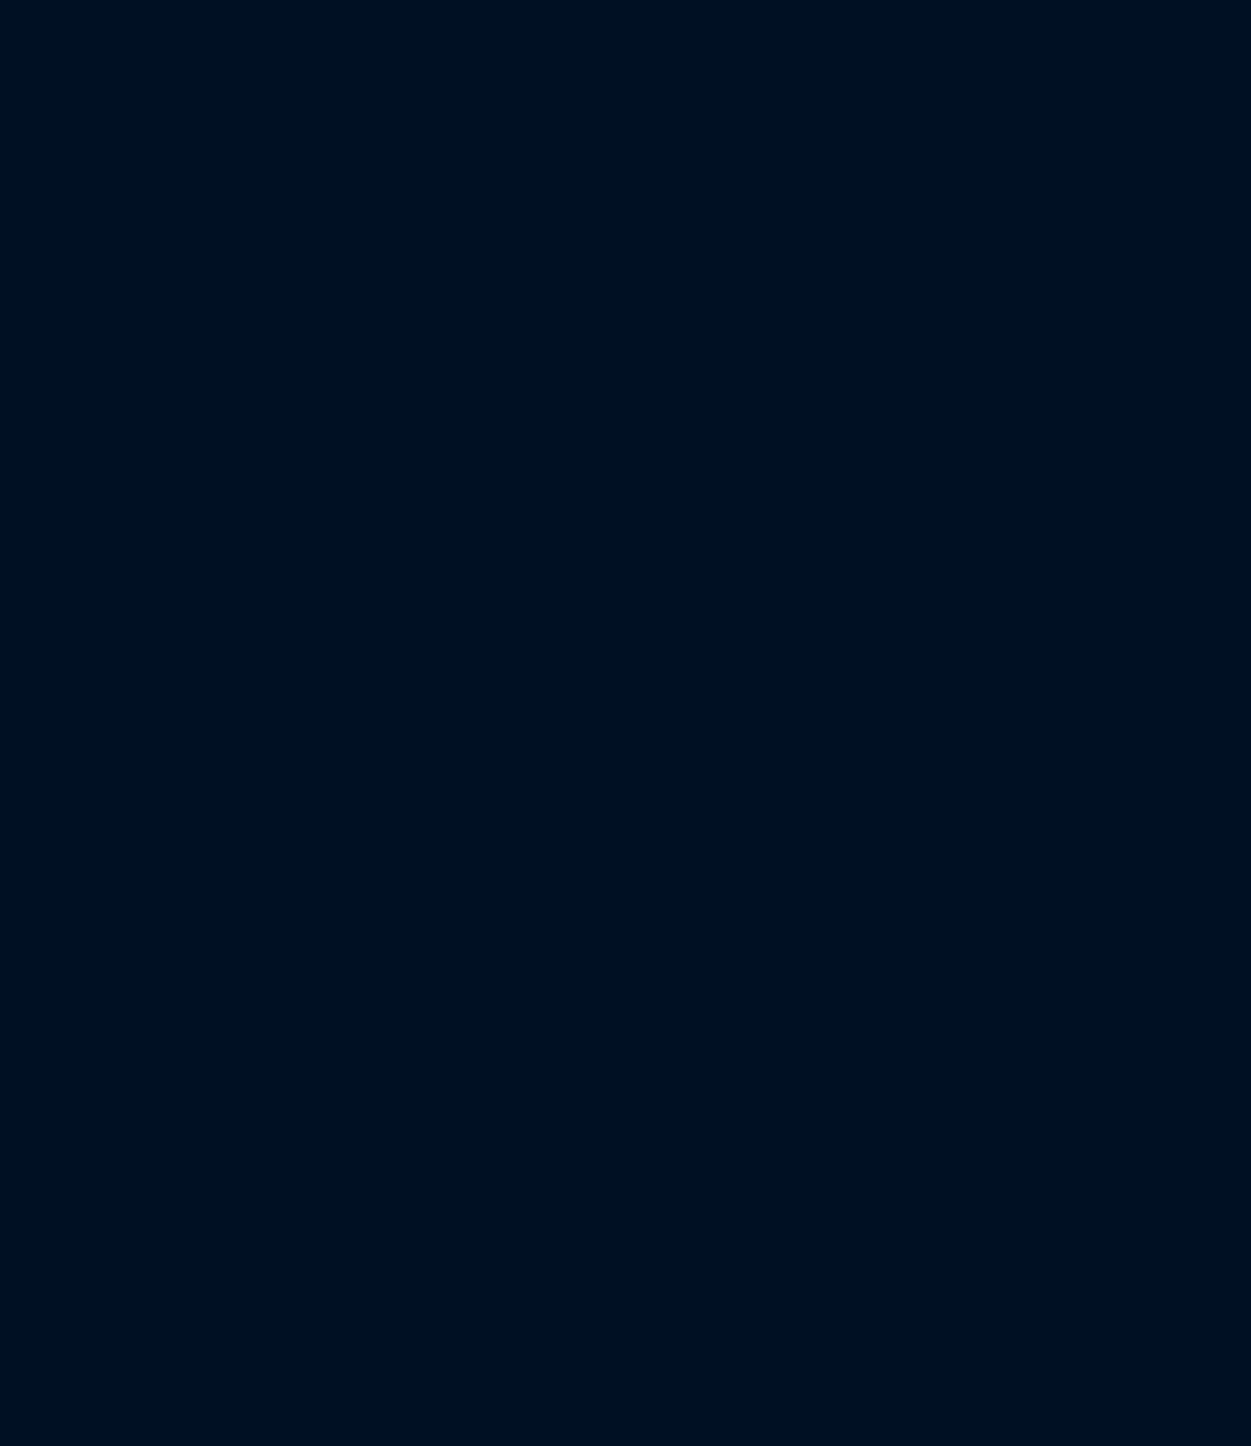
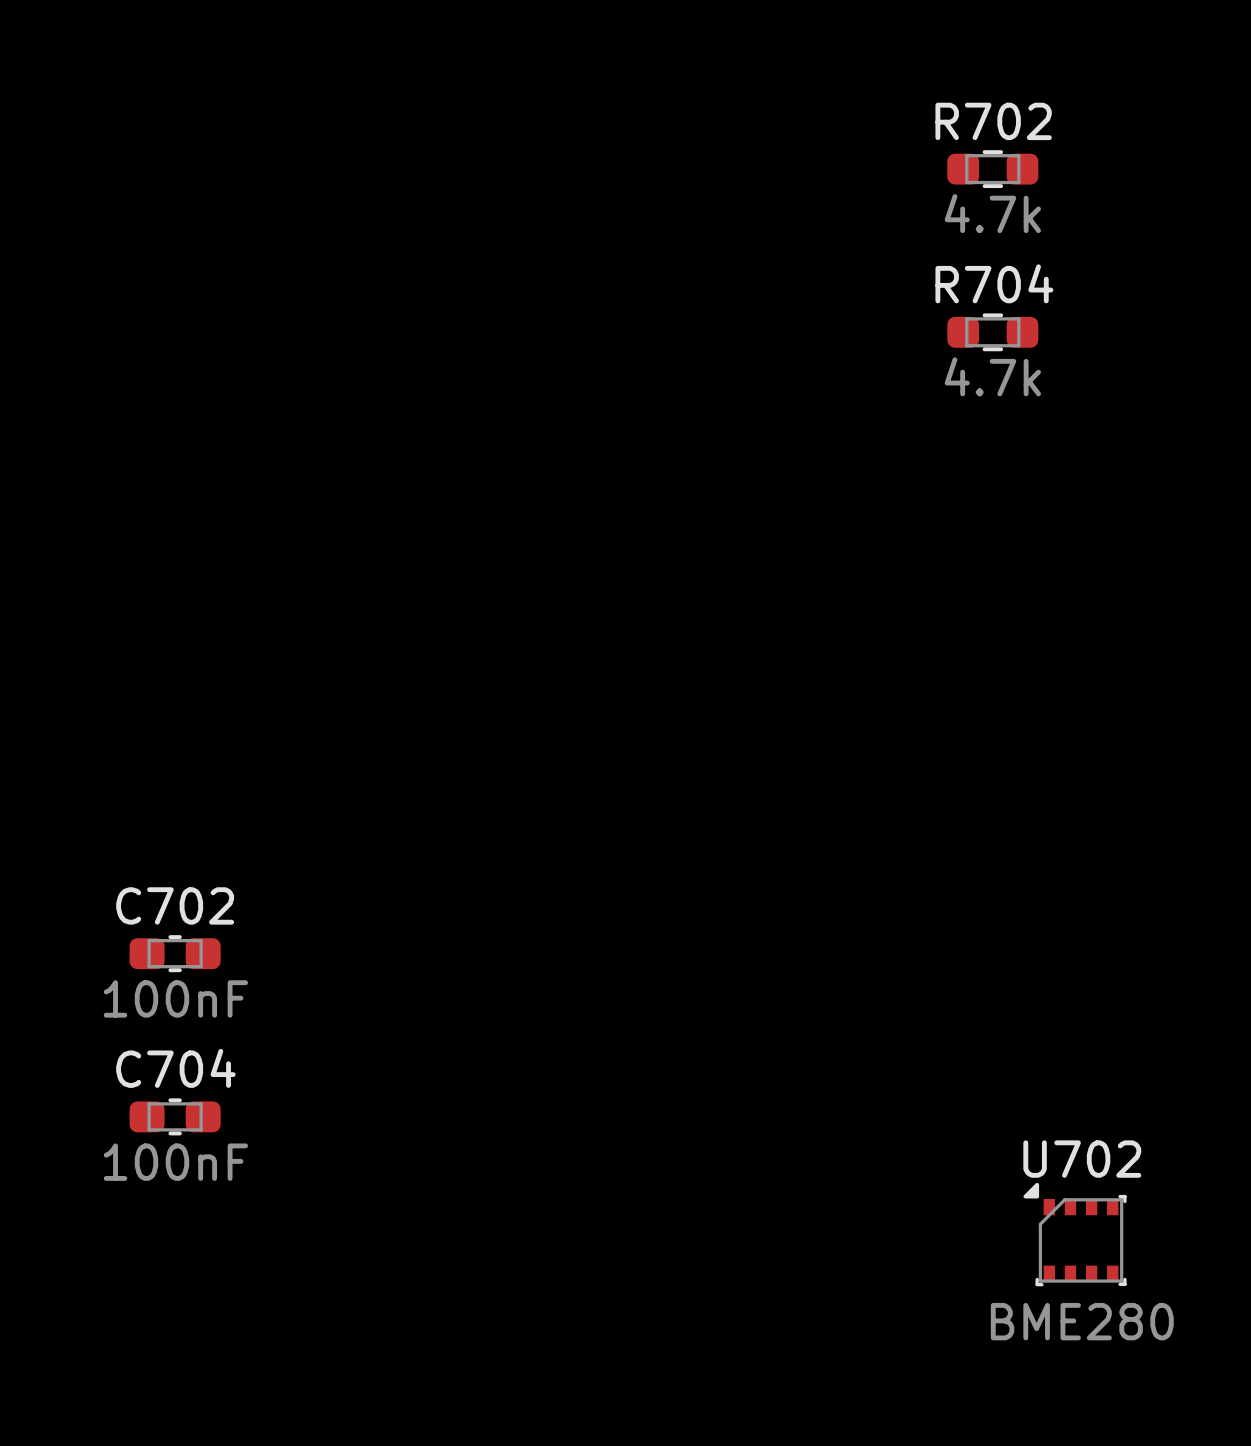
R702: none -> 4.7k (992, 169)
R704: none -> 4.7k (992, 332)
C702: none -> 100nF (175, 953)
C704: none -> 100nF (175, 1116)
U702: none -> BME280 (1075, 1234)

